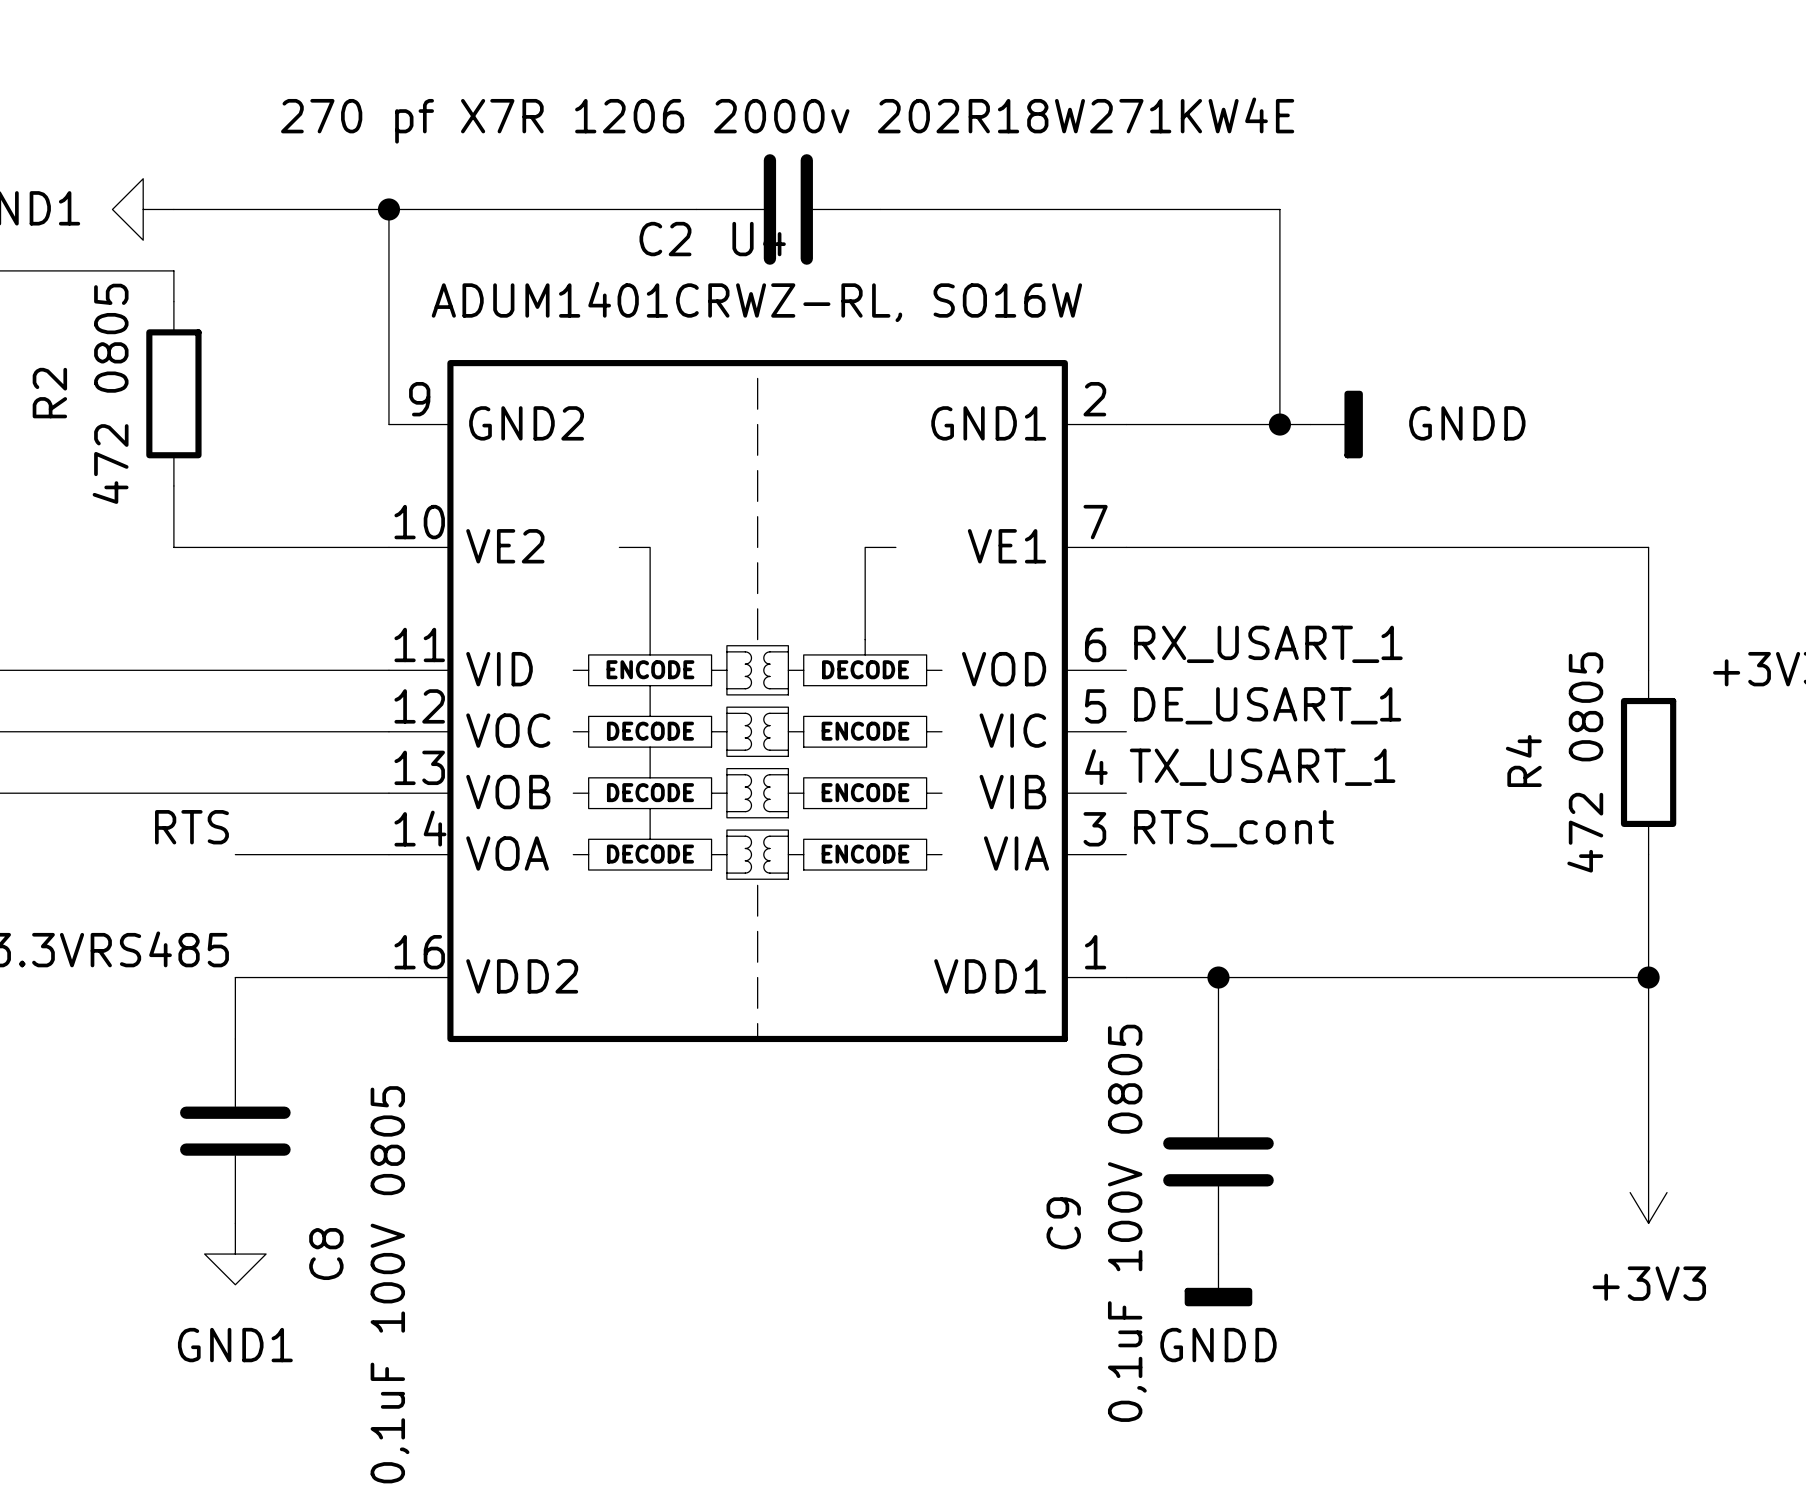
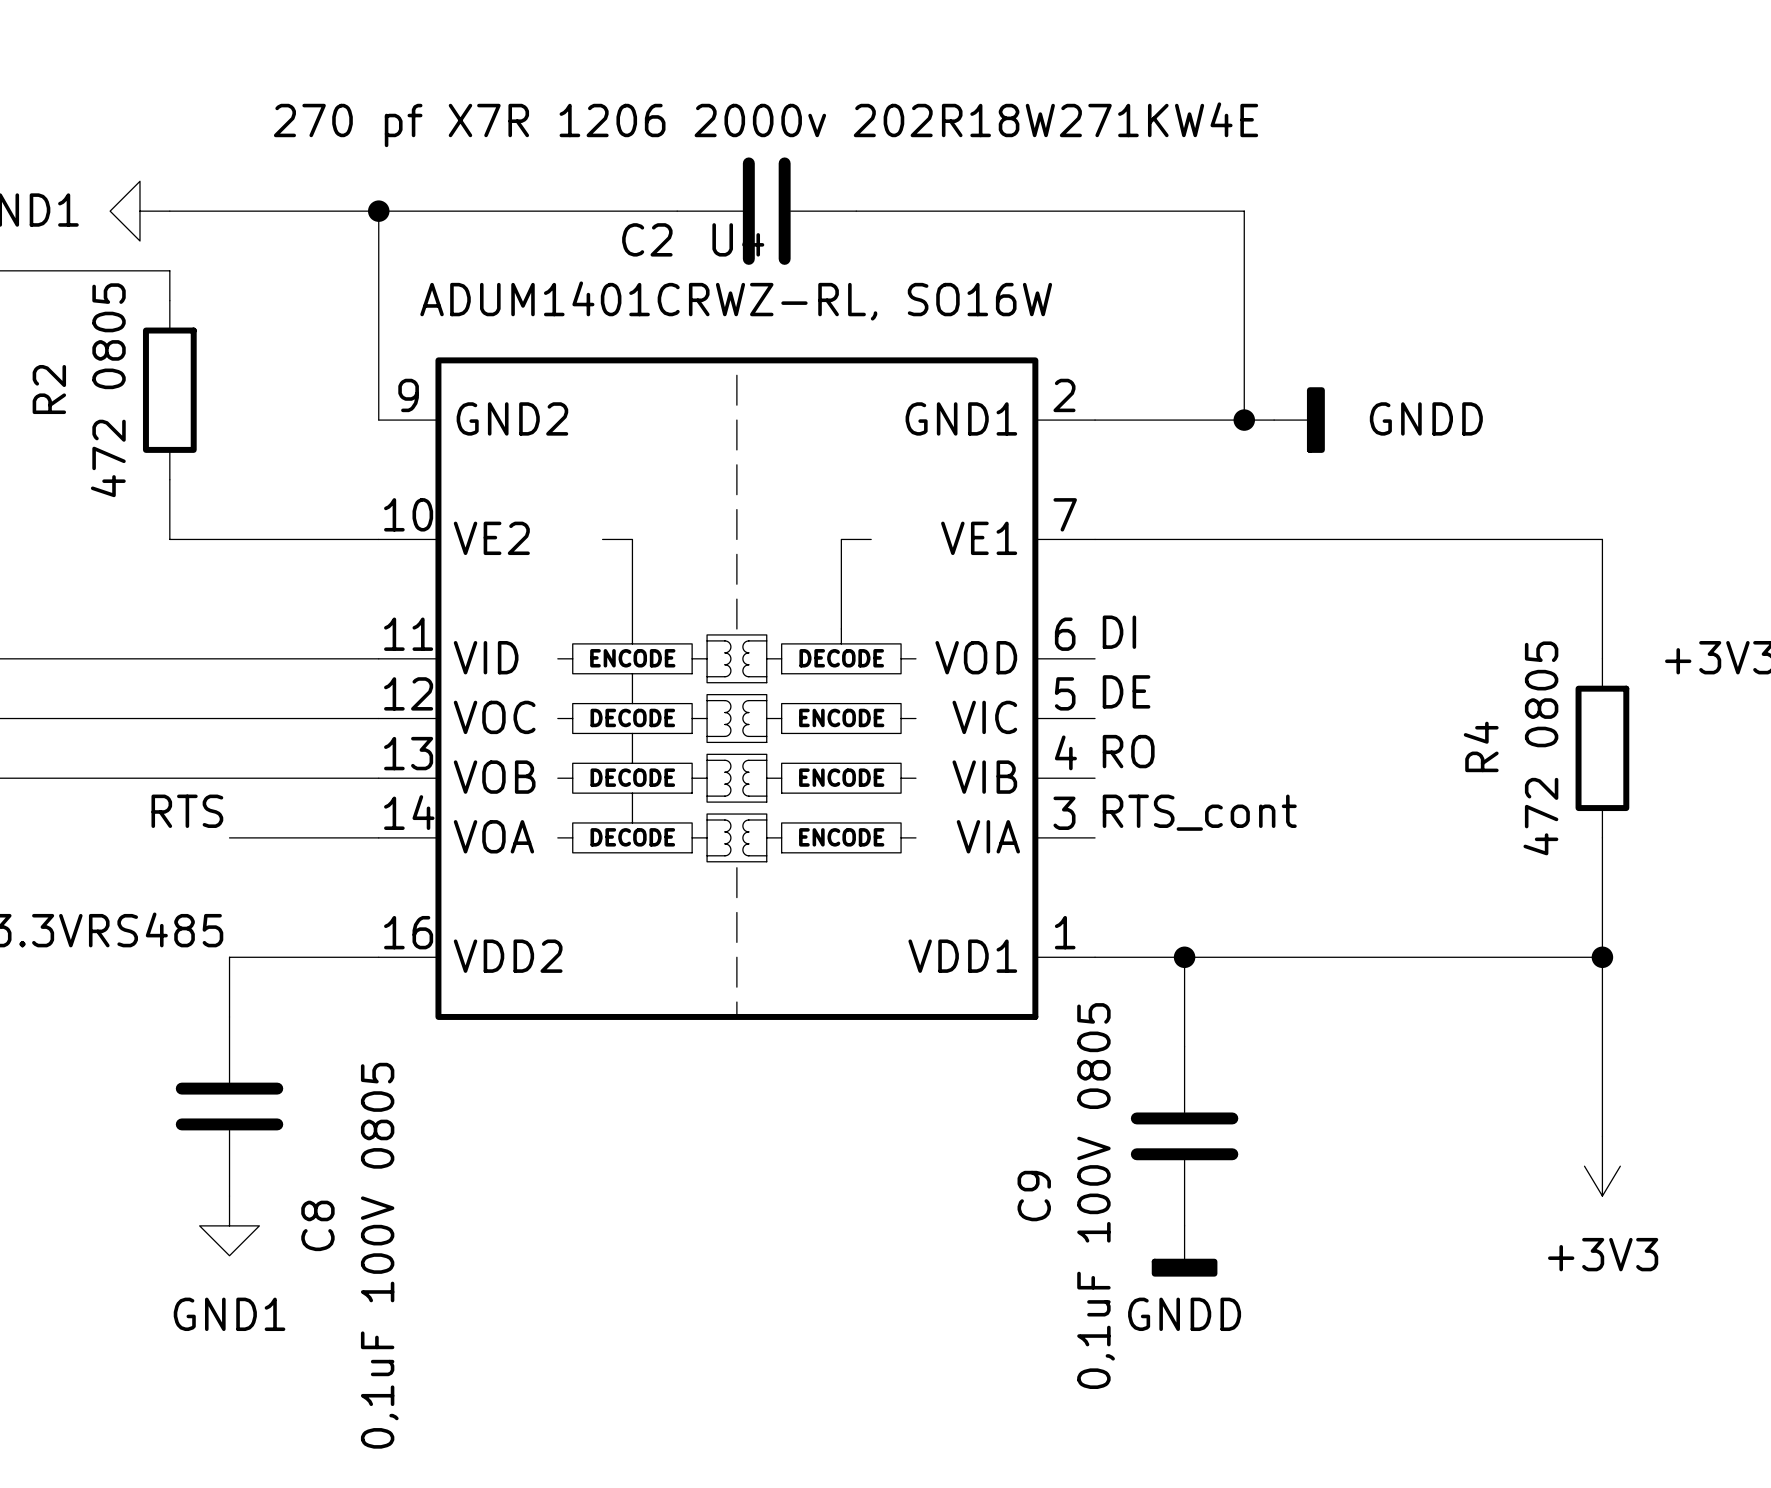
label: RX_USART_1 (1268, 644) -> DI (1119, 632)
label: DE_USART_1 (1267, 705) -> DE (1126, 691)
label: TX_USART_1 (1262, 767) -> RO (1128, 751)

